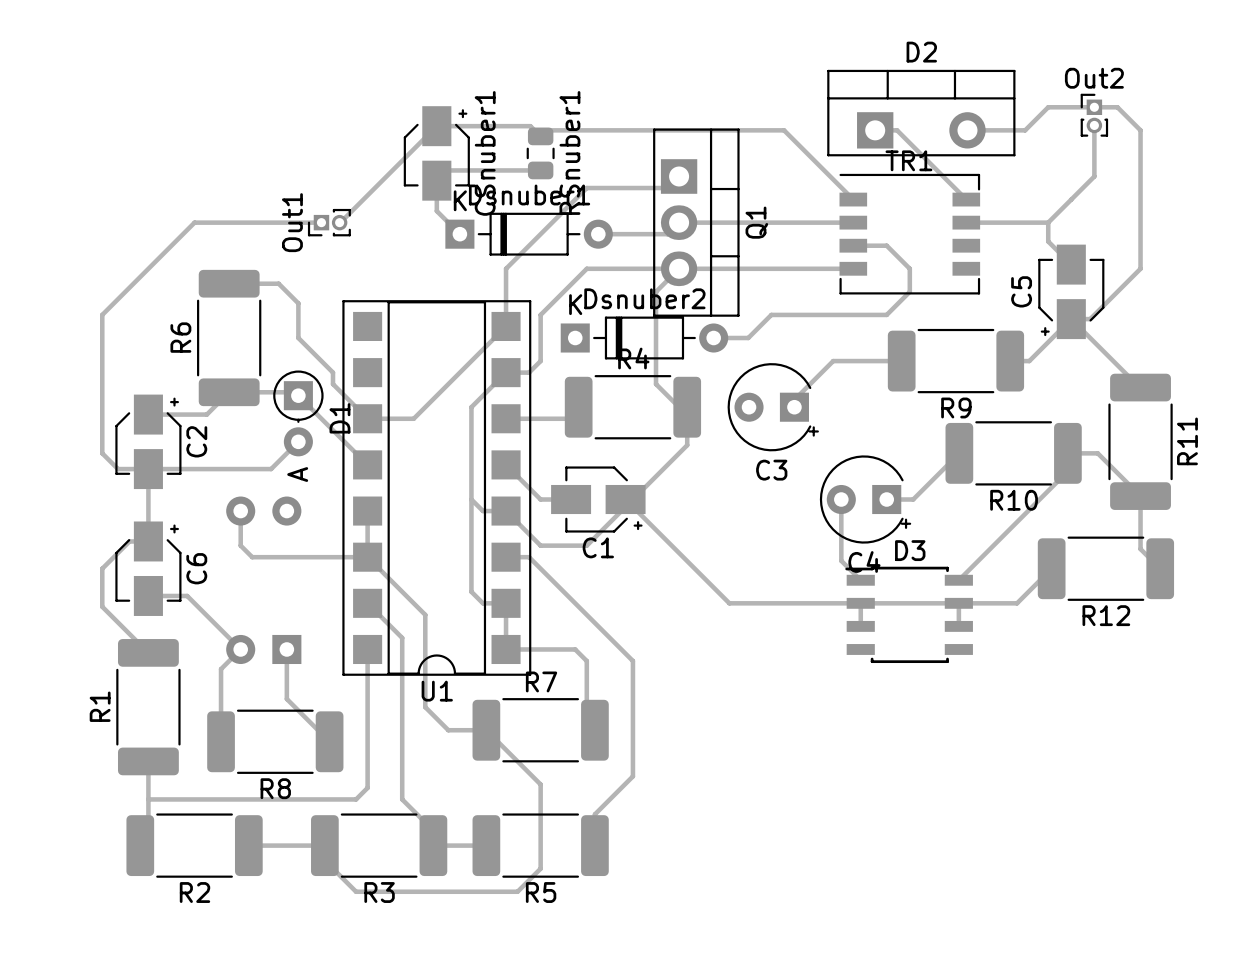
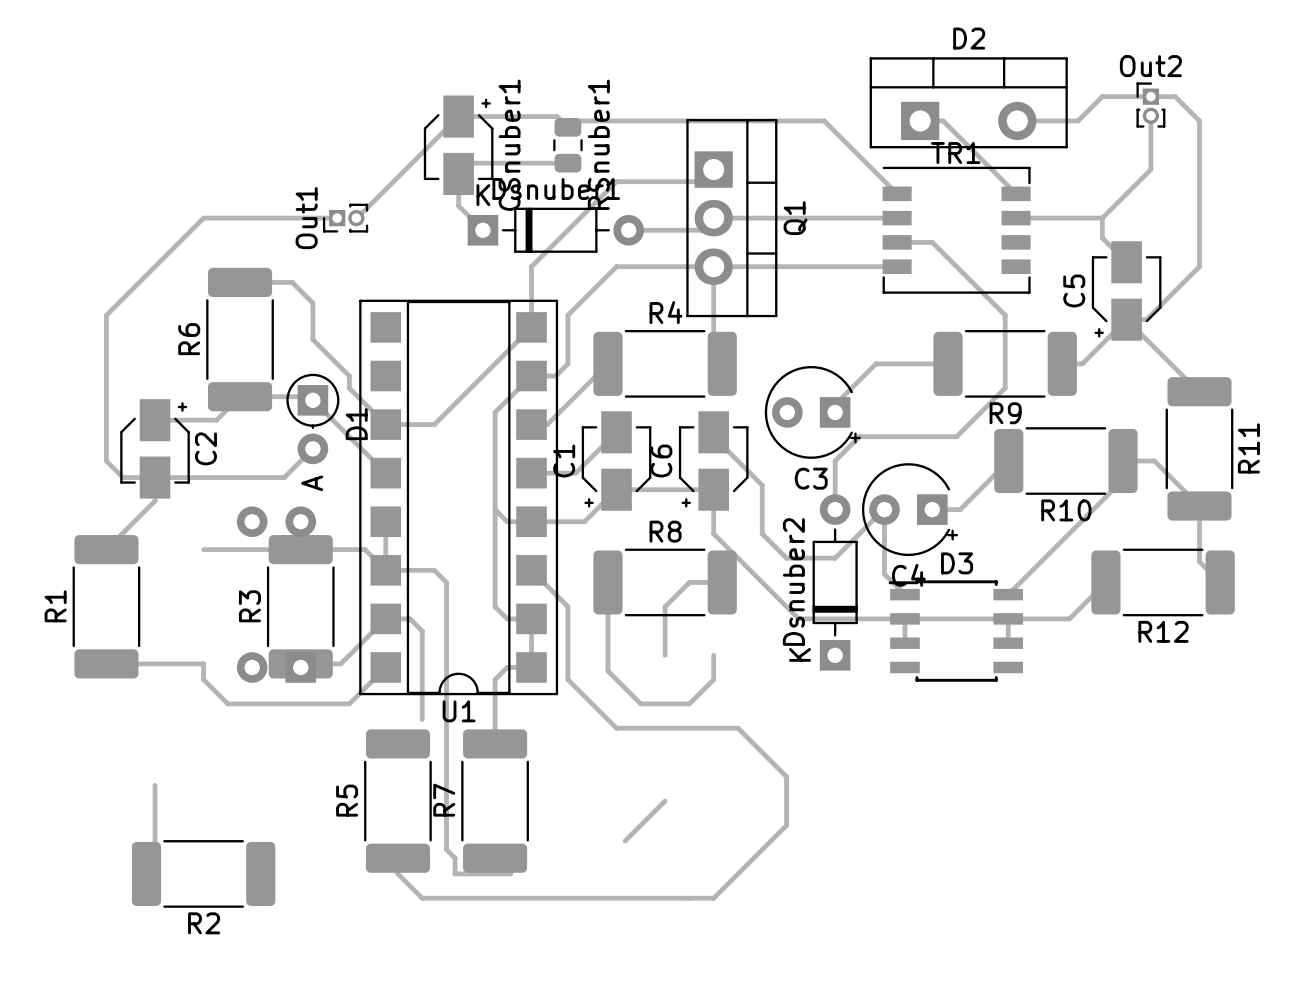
track: (679, 268) (656, 291) (656, 384) (679, 407) (687, 407) (687, 445) (632, 499) (625, 499) -> (713, 266) (713, 355) (722, 363)
track: (909, 268) (909, 291) (886, 314) (771, 314) (748, 338) (713, 338) -> (956, 266) (1005, 315) (1005, 388) (956, 436) (859, 436) (835, 461) (835, 509)
Dsnuber2 rotation: 0° (644, 338) -> 90° counterclockwise (835, 582)
Dsnuber2 position: (644, 338) -> (835, 582)
track: (578, 407) (567, 418) (520, 418) -> (607, 363) (547, 424)
R4 position: (632, 407) -> (665, 363)
track: none -> (713, 432) (713, 436) (762, 485) (762, 533) (786, 558) (835, 558) (884, 509)
track: (506, 464) (540, 499) (571, 499) -> (531, 473) (575, 473) (616, 432)
track: (148, 491) (148, 541) (129, 541) (102, 568) (102, 606) (148, 652) -> (155, 501) (106, 549)
C1 rotation: 0° (598, 499) -> 90° clockwise (616, 461)
track: (625, 499) (729, 603) (759, 603) -> (531, 521) (584, 521) (616, 489) (713, 489) (713, 533) (798, 618)
track: (625, 499) (625, 506) (586, 545) (540, 545) (506, 511) -> none
track: (240, 511) (240, 545) (252, 557) (367, 557) (425, 614) -> (203, 549) (365, 549) (385, 570) (434, 570) (446, 582) (446, 631)
track: (506, 557) (529, 557) (632, 661) (632, 776) -> (531, 570) (567, 606) (567, 679) (616, 728) (737, 728) (786, 776) (786, 825) (713, 898) (422, 898) (397, 873) (397, 858)
C6 rotation: 0° (148, 568) -> 180° (713, 461)
C6 position: (148, 568) -> (713, 461)
track: none -> (722, 582) (689, 582) (665, 606) (665, 655)
track: (148, 595) (187, 595) (240, 649) (221, 669) (221, 741) -> none
track: (367, 603) (402, 637) -> (300, 663) (340, 663) (385, 618) (410, 618) (422, 631) (422, 655)
track: (286, 649) (286, 699) (329, 741) -> none
track: (367, 649) (367, 787) (356, 799) (148, 799) -> (385, 667) (349, 703) (227, 703) (203, 679) (203, 663) (106, 663)
track: (506, 649) (575, 649) (578, 652) -> (607, 582) (607, 671)
track: none -> (531, 667) (507, 667) (495, 679) (495, 743)
track: (586, 661) (586, 722) (594, 730) -> (616, 679) (640, 703) (689, 703) (713, 679) (713, 655)
R7 name position: R7 (541, 681) -> R7 (444, 800)
track: (402, 699) (402, 799) (425, 822) -> (446, 728) (446, 849)
R1 position: (148, 707) -> (106, 606)
track: (425, 707) (448, 730) (486, 730) (540, 784) (540, 868) (517, 891) (356, 891) (324, 860) (324, 845) (248, 845) -> none
R7 rotation: 0° (540, 730) -> 90° clockwise (495, 801)
R7 position: (540, 730) -> (495, 801)
R8 position: (275, 741) -> (665, 582)
R8 name position: R8 (275, 788) -> R8 (665, 531)
R3 rotation: 0° (379, 845) -> 90° clockwise (300, 606)
R3 position: (379, 845) -> (300, 606)
R5 rotation: 0° (540, 845) -> 90° clockwise (397, 801)
R5 position: (540, 845) -> (397, 801)

